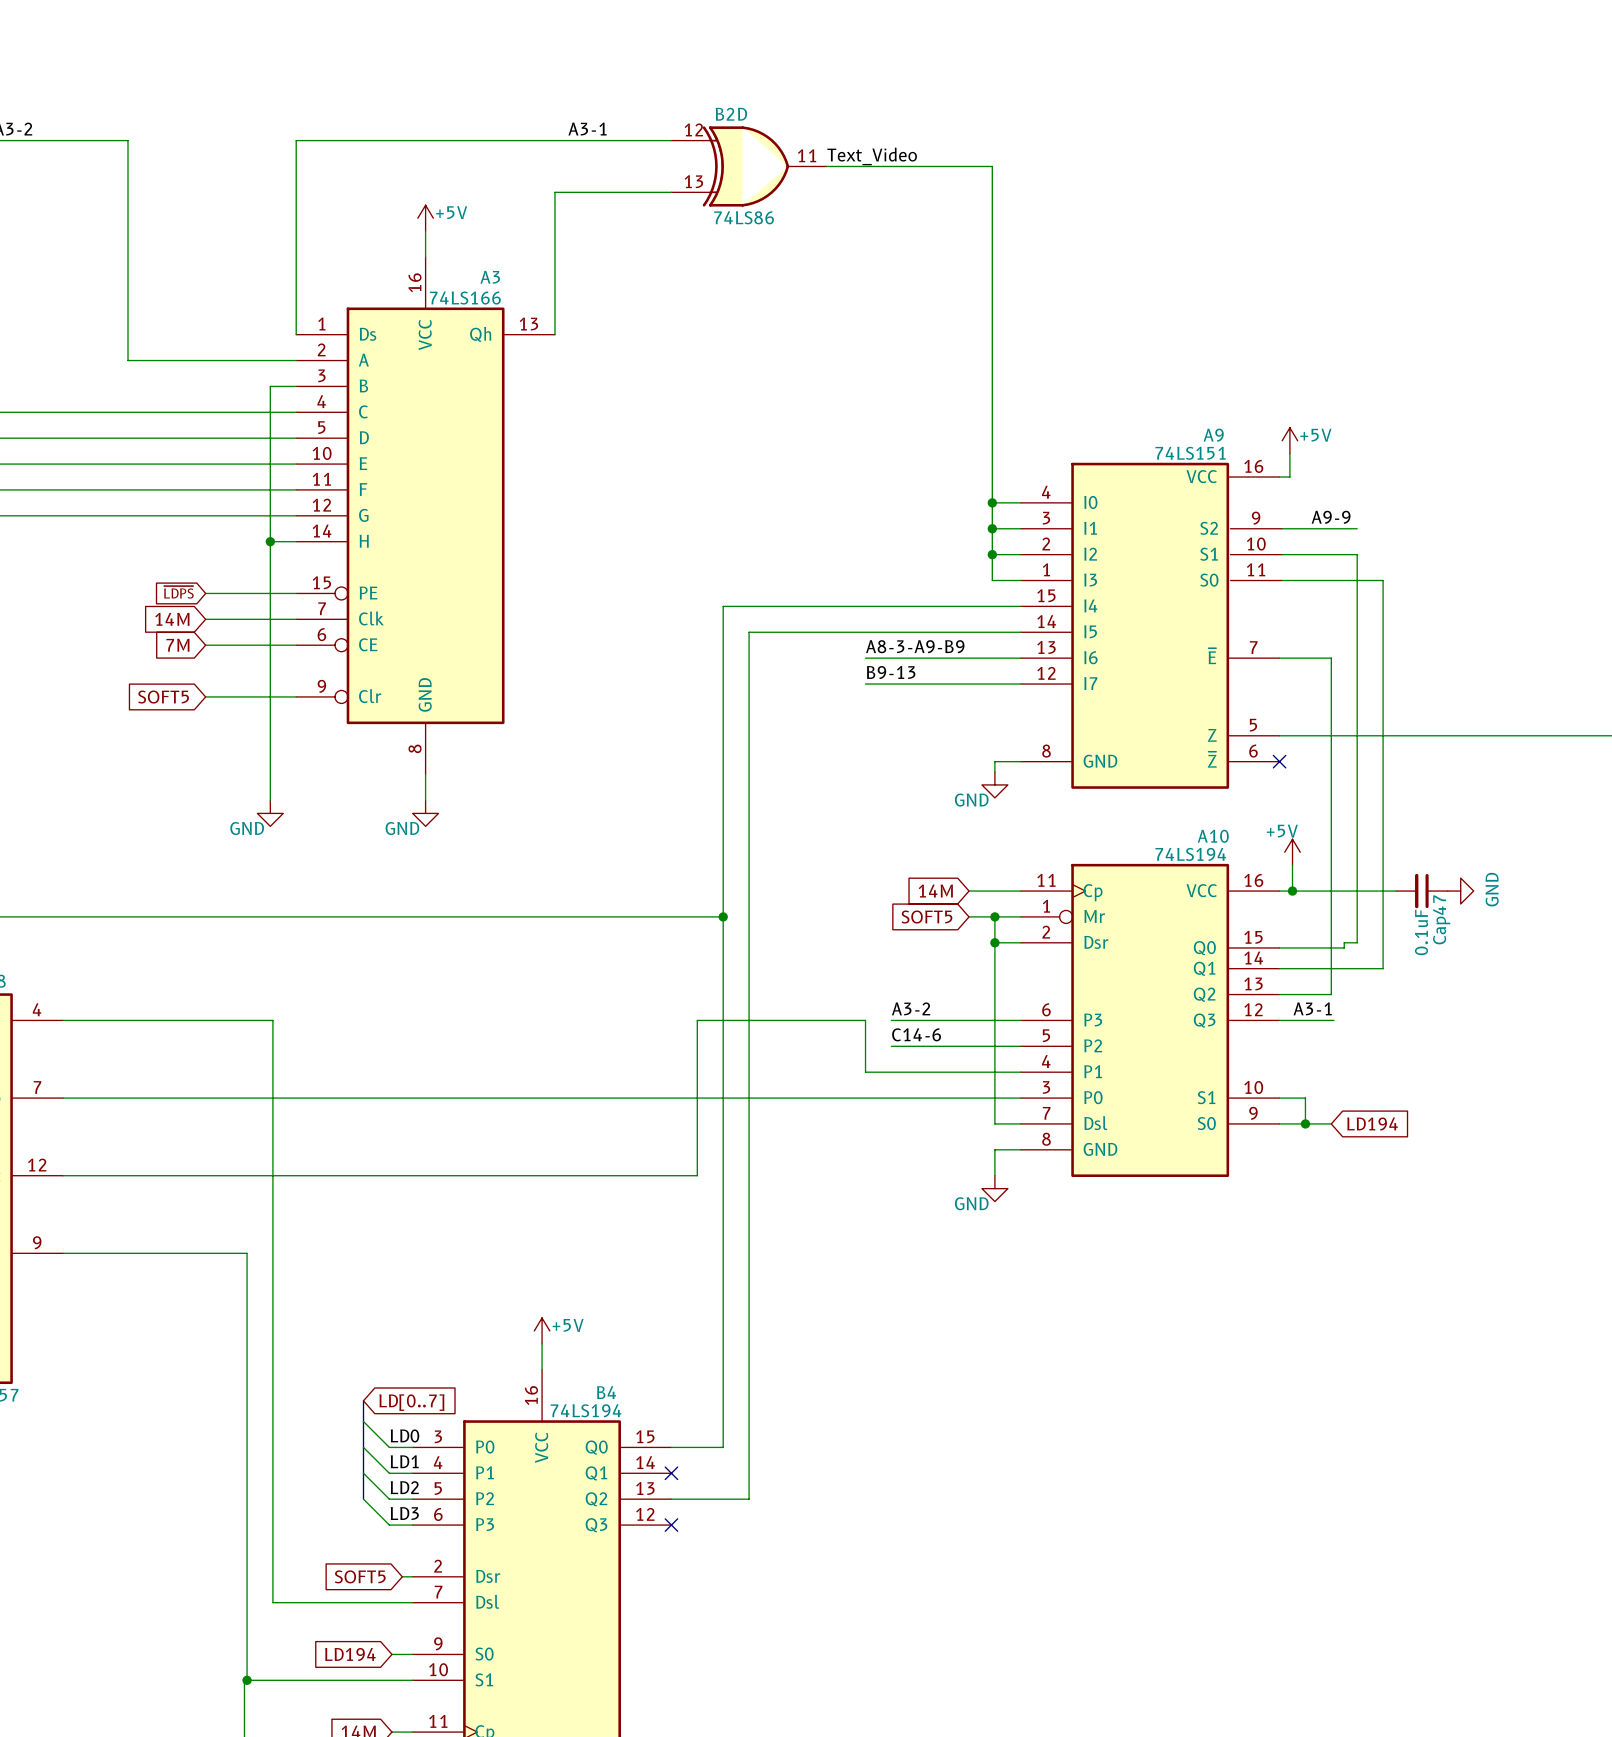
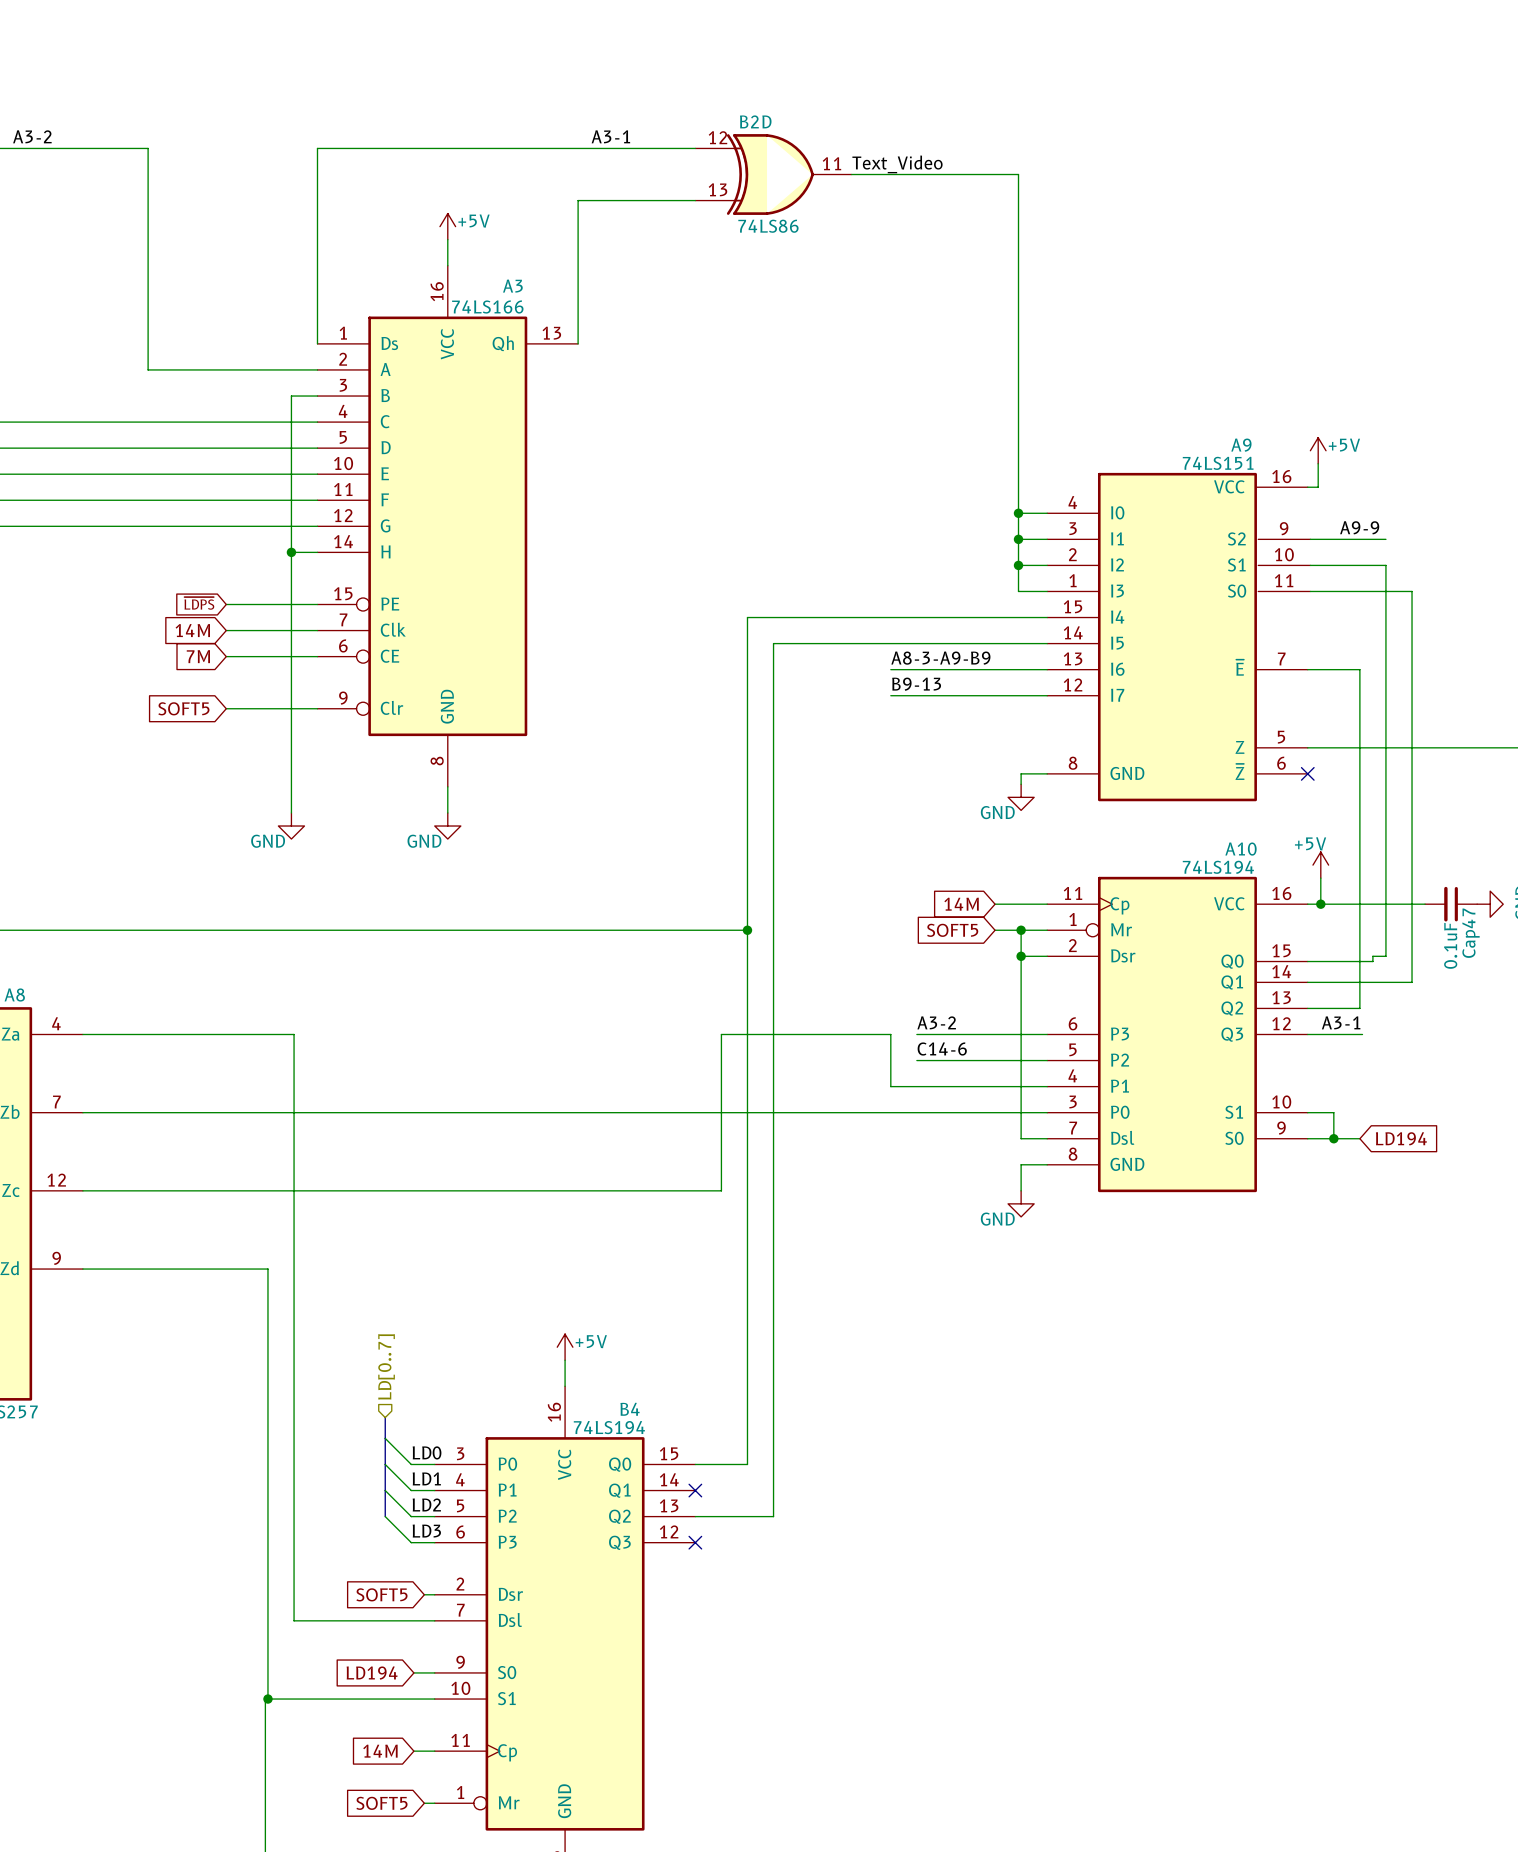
hierarchical label: none -> LD[0..7] (386, 1366)
global label: LD[0..7] (411, 1402) -> none

